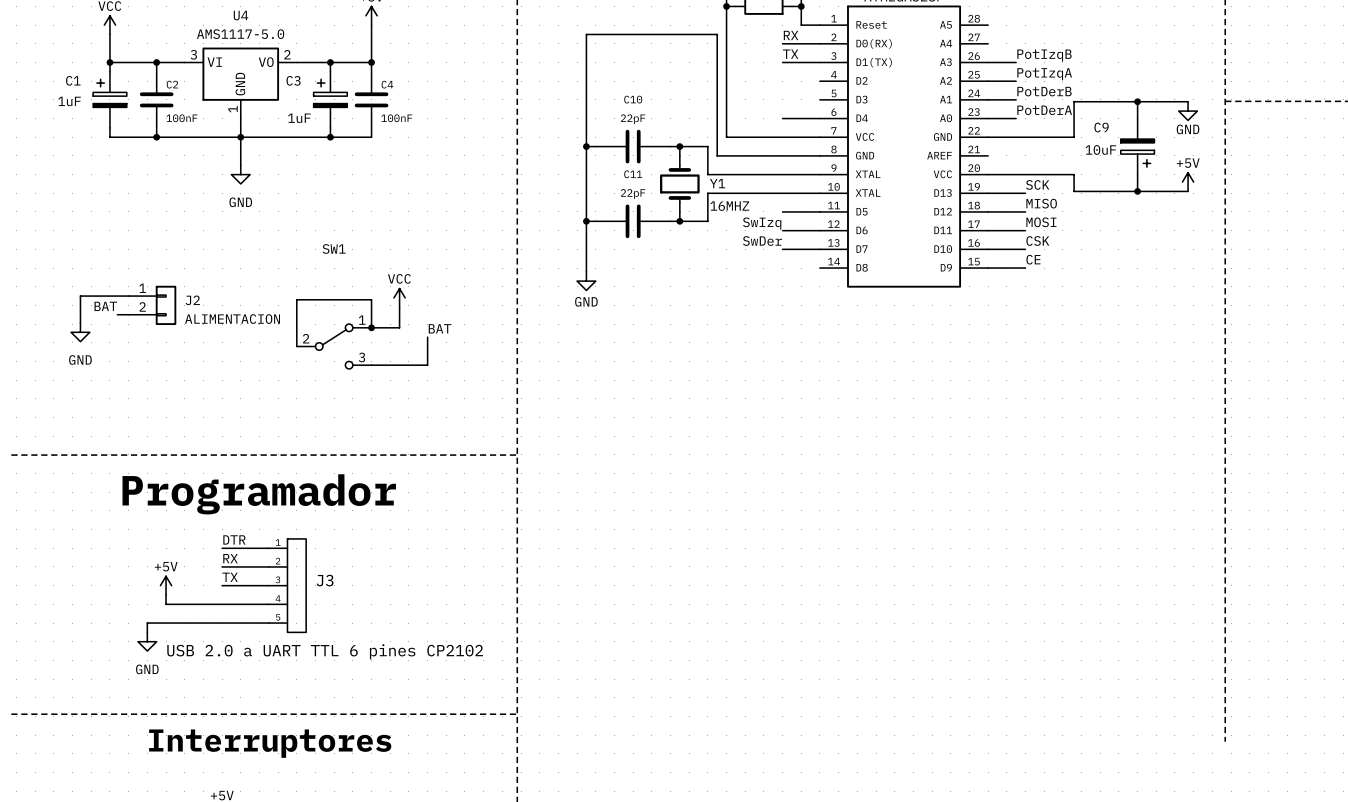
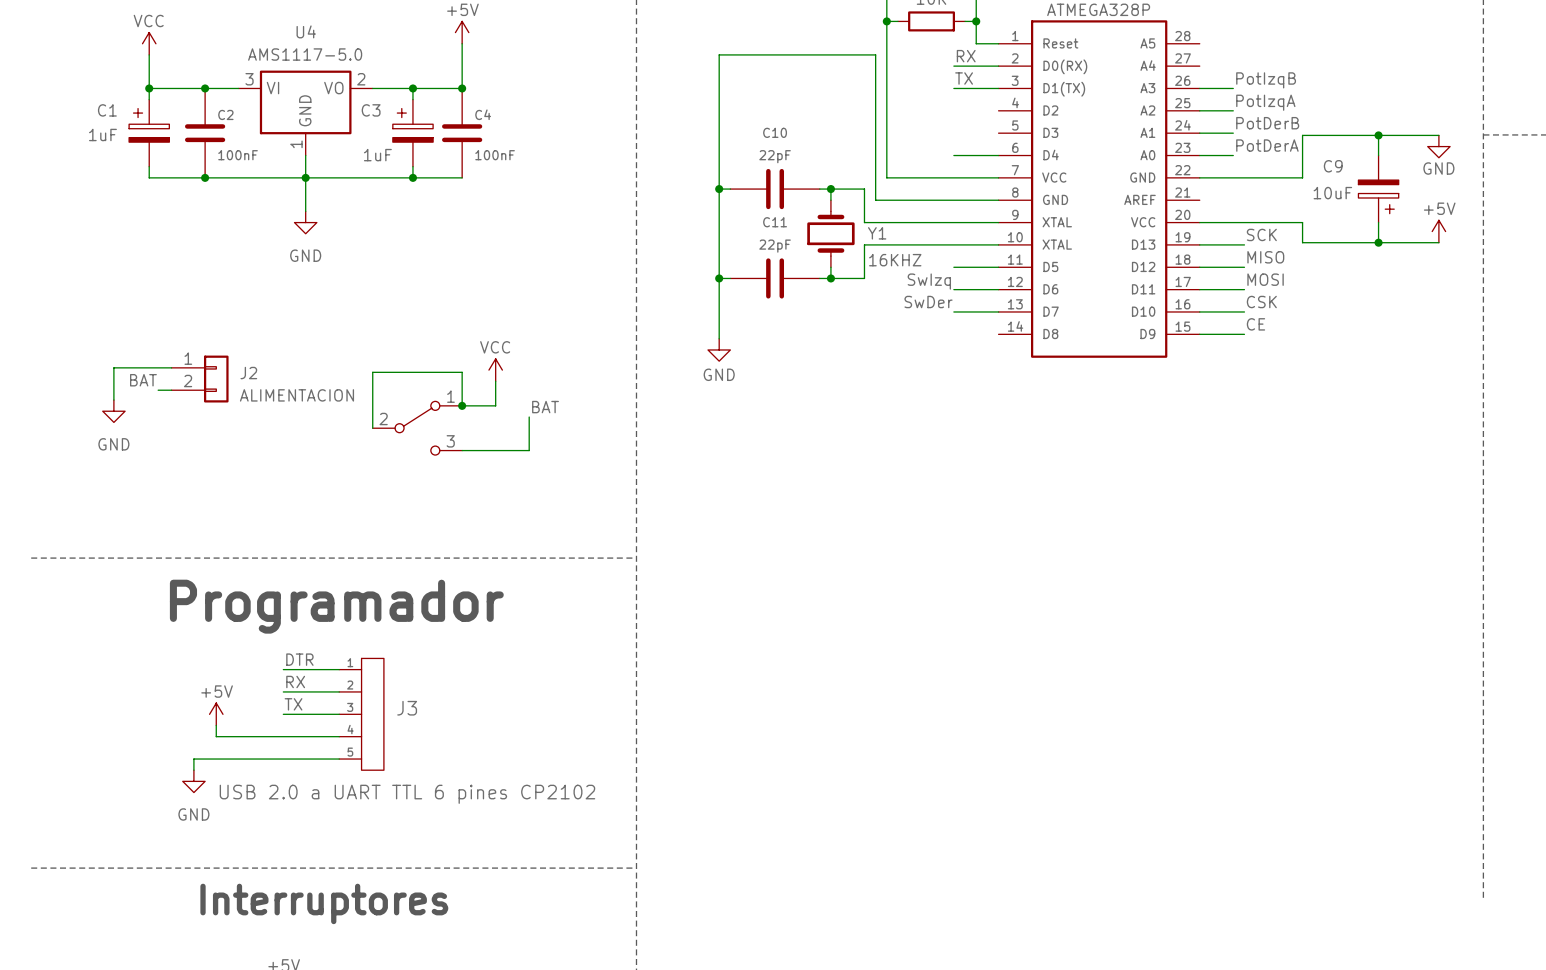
Y1 value: 16MHZ (729, 206) -> 16KHZ (895, 260)
SW1 name: SW1 (334, 248) -> none

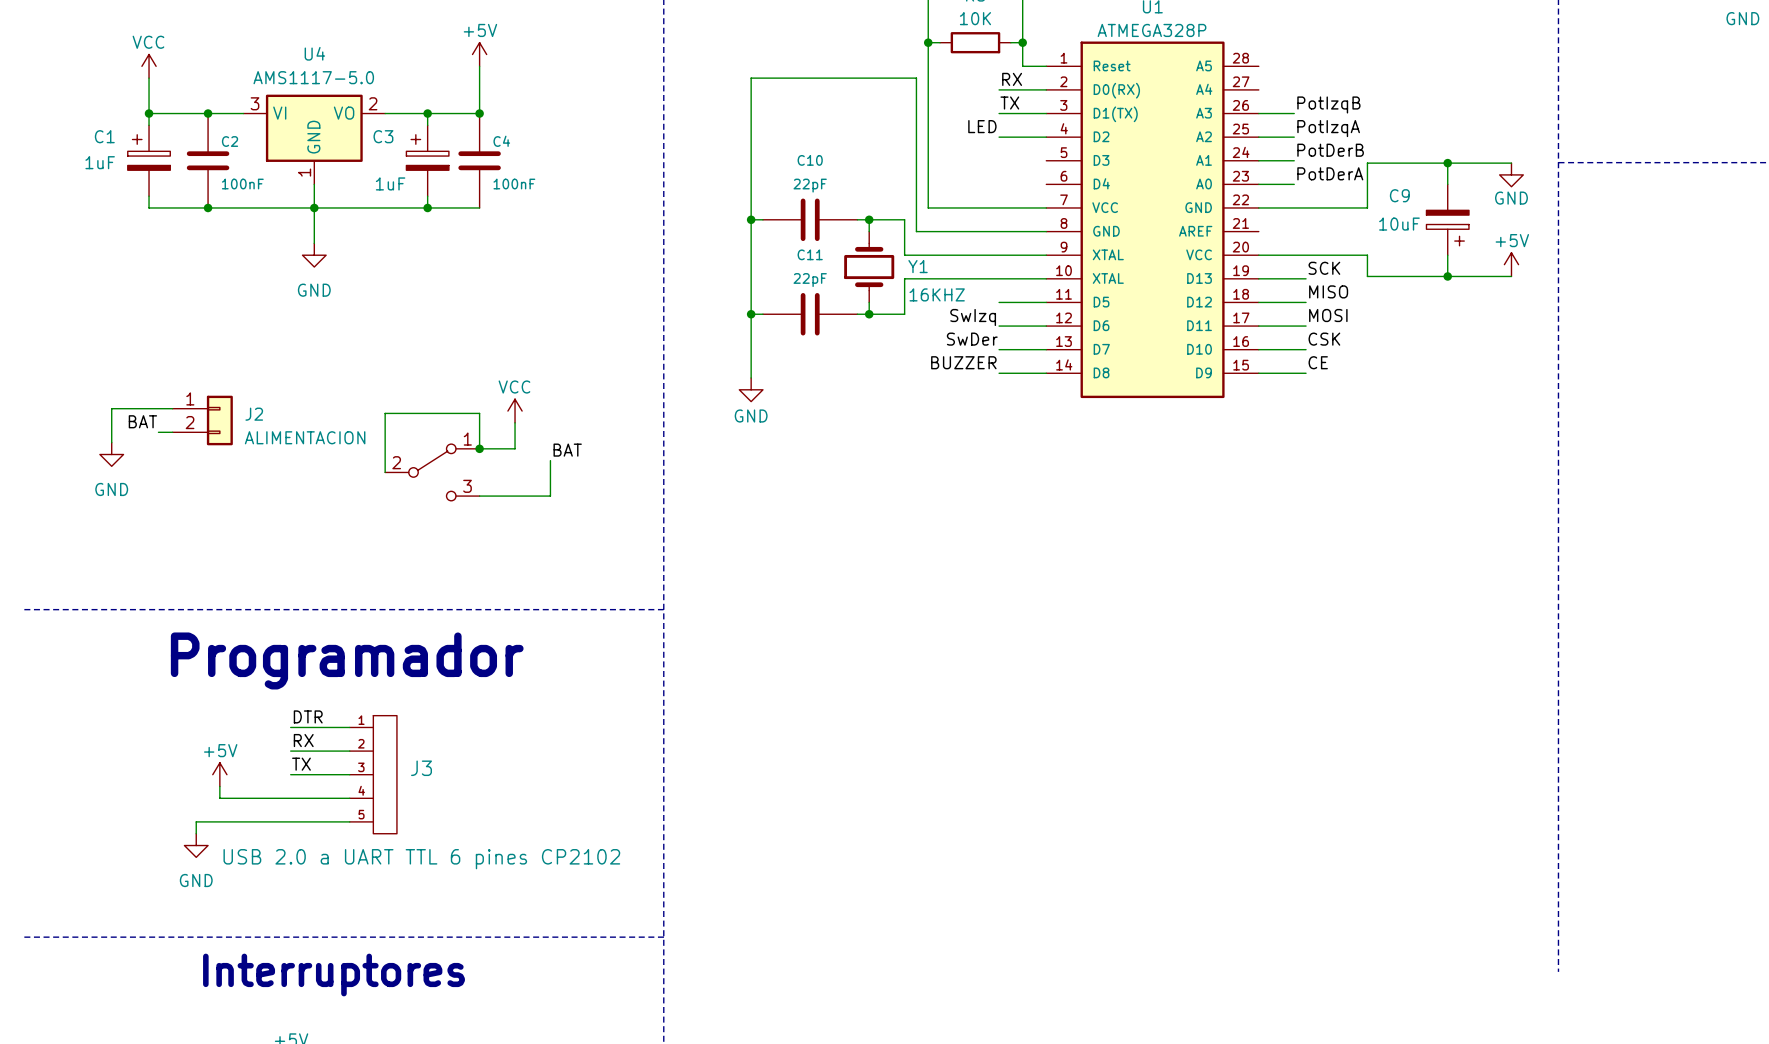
label: none -> LED (982, 126)
wire: (953, 155) (998, 155) -> (999, 137) (1046, 137)
label: none -> BUZZER (963, 362)
wire: none -> (999, 373) (1046, 373)

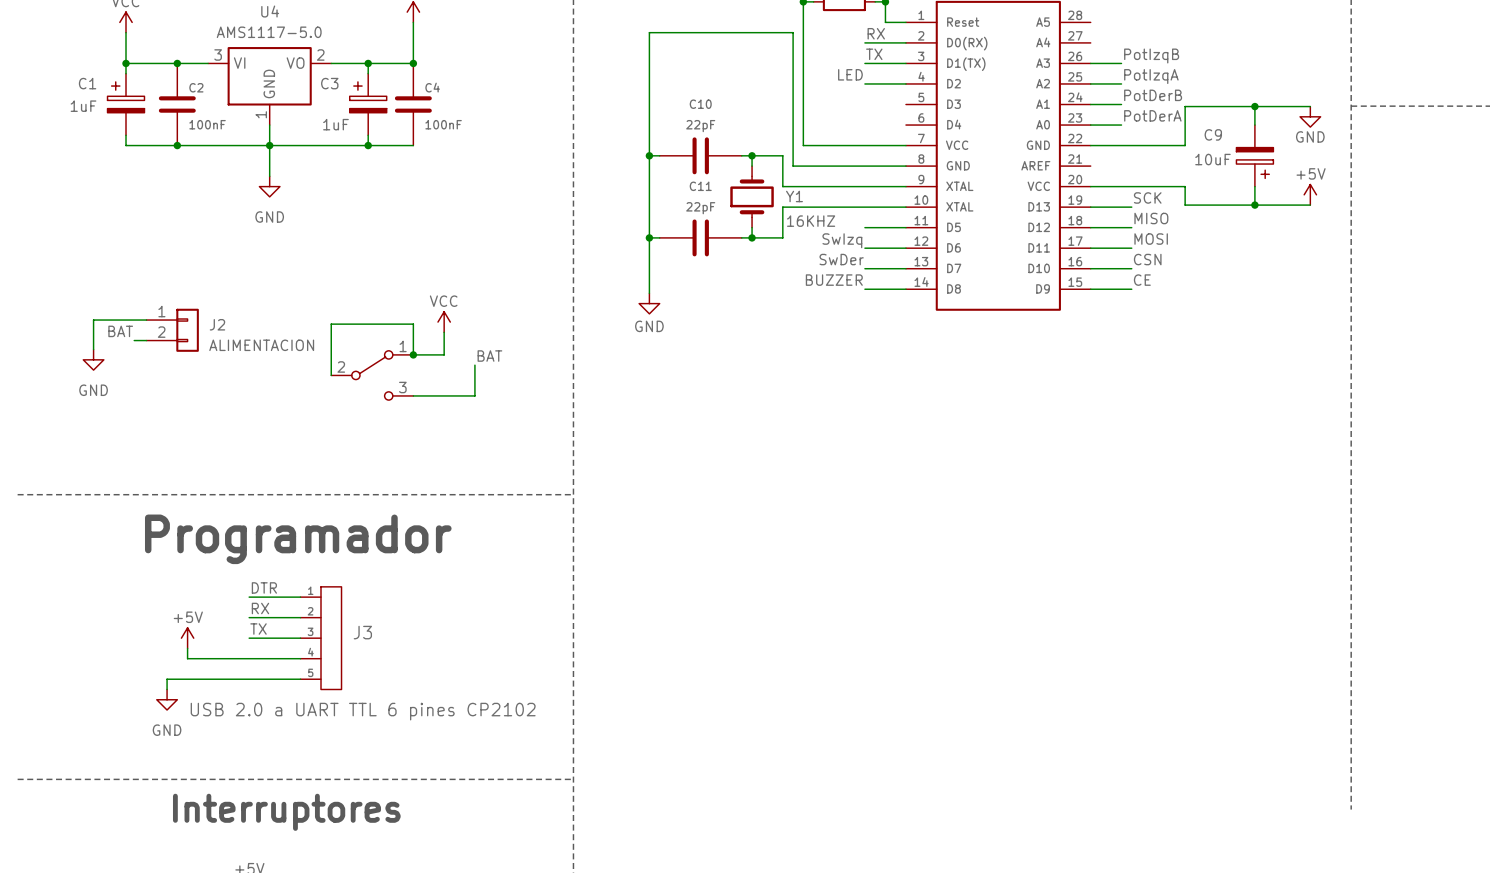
label: CSK (1324, 339) -> CSN (1147, 259)

